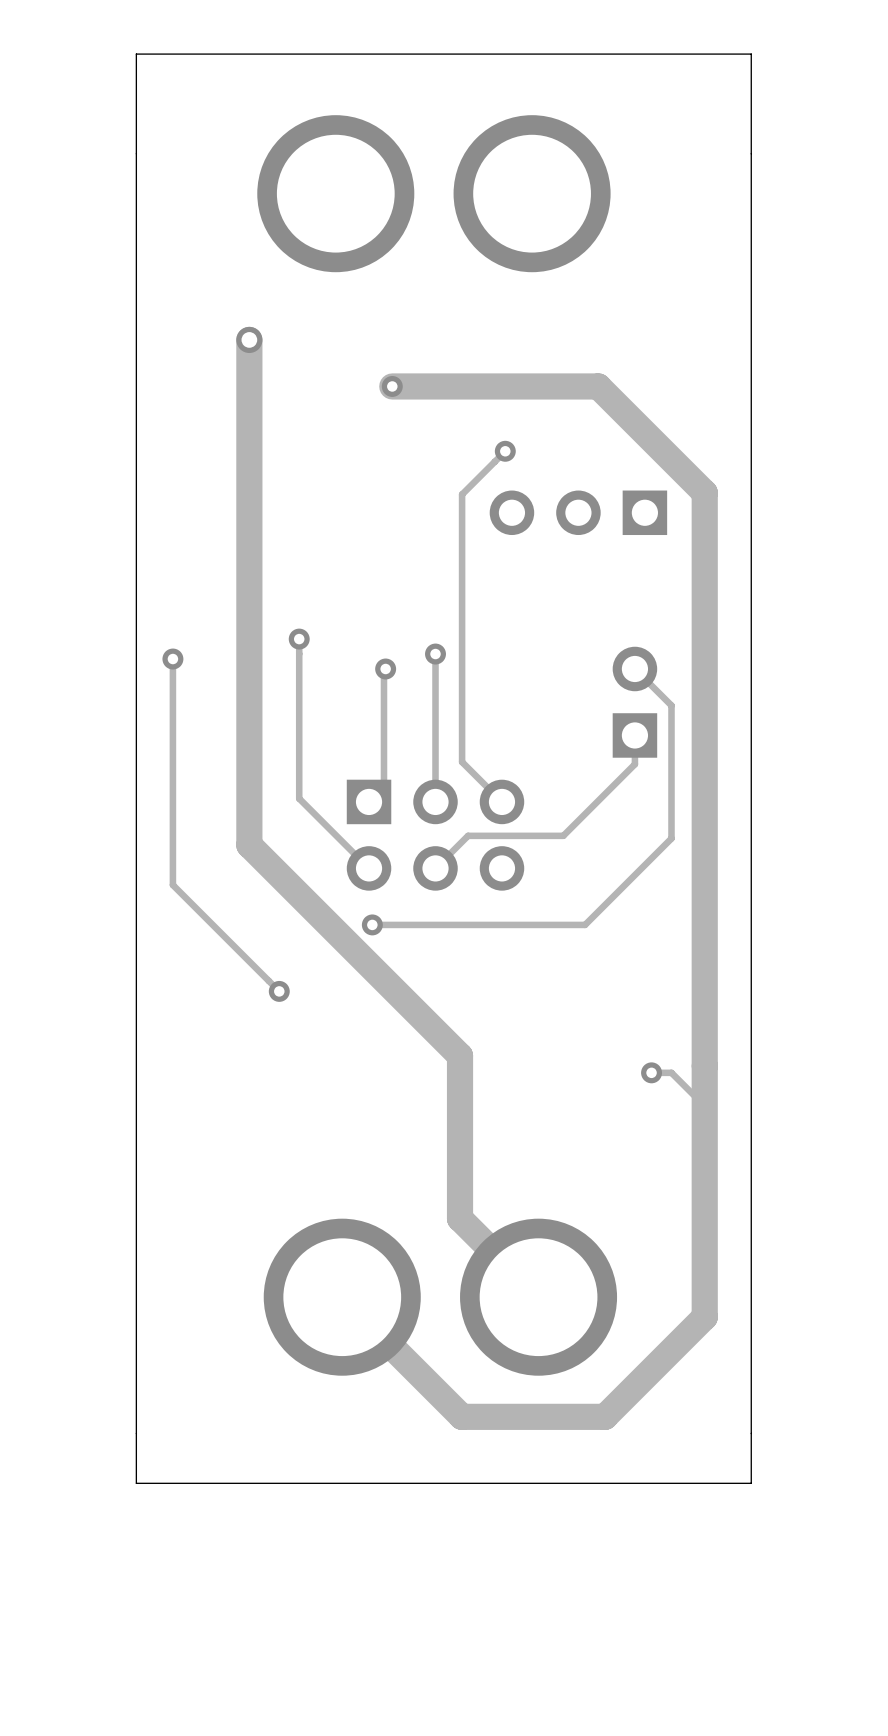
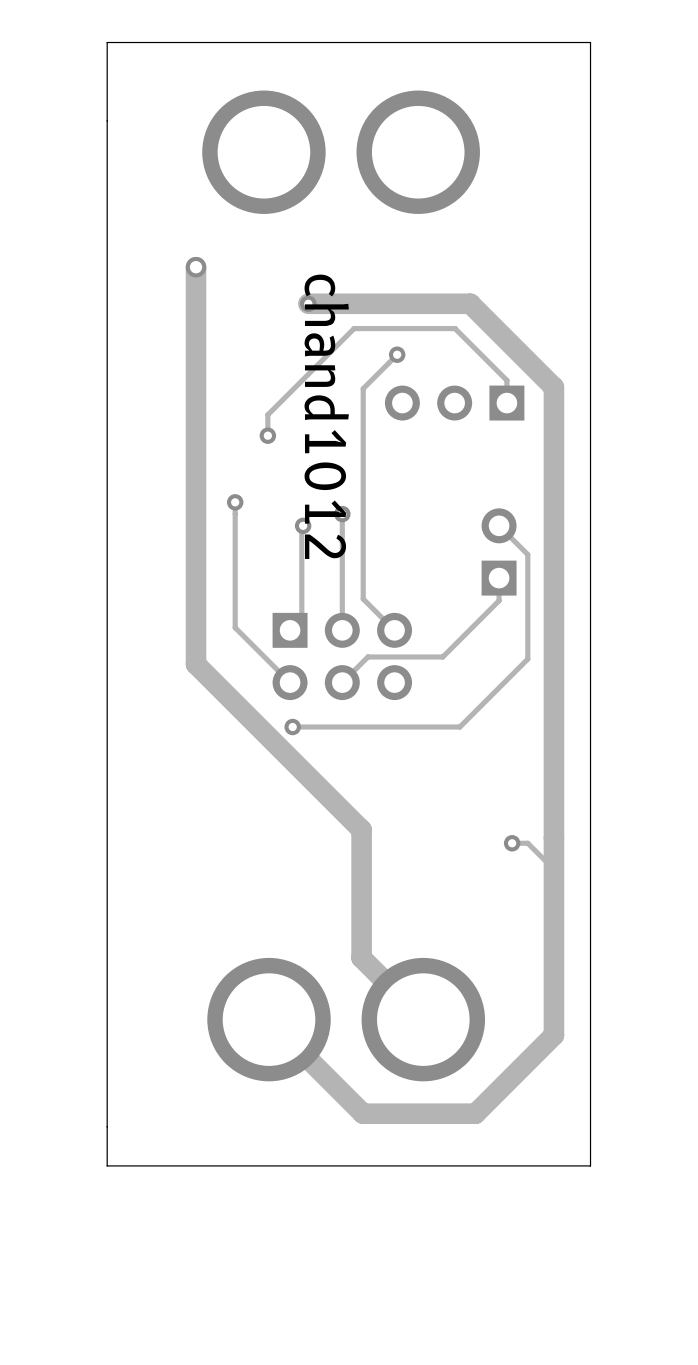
track: none -> (506, 403) (506, 380) (455, 328) (354, 328) (267, 414) (267, 435)
text: none -> chand1012 (326, 416)
via: none -> (267, 435)
track: (172, 659) (172, 885) (279, 991) -> none
via: (172, 659) -> none
via: (279, 991) -> none

